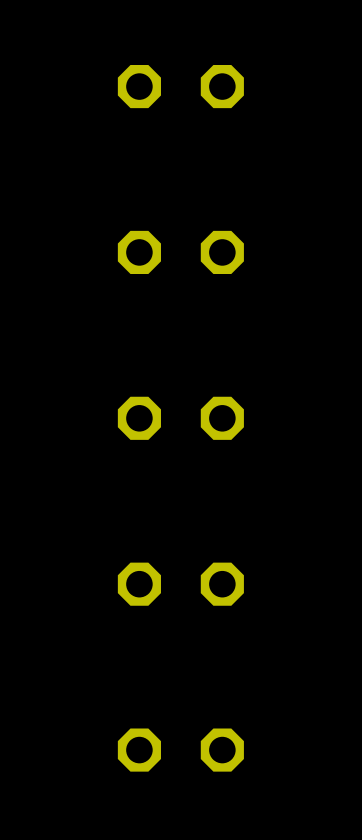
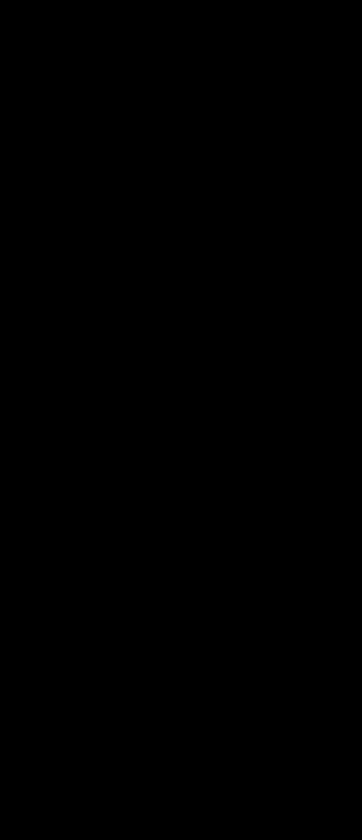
part: (180, 86) -> none
part: (180, 252) -> none
part: (180, 418) -> none
part: (180, 584) -> none
part: (180, 750) -> none

